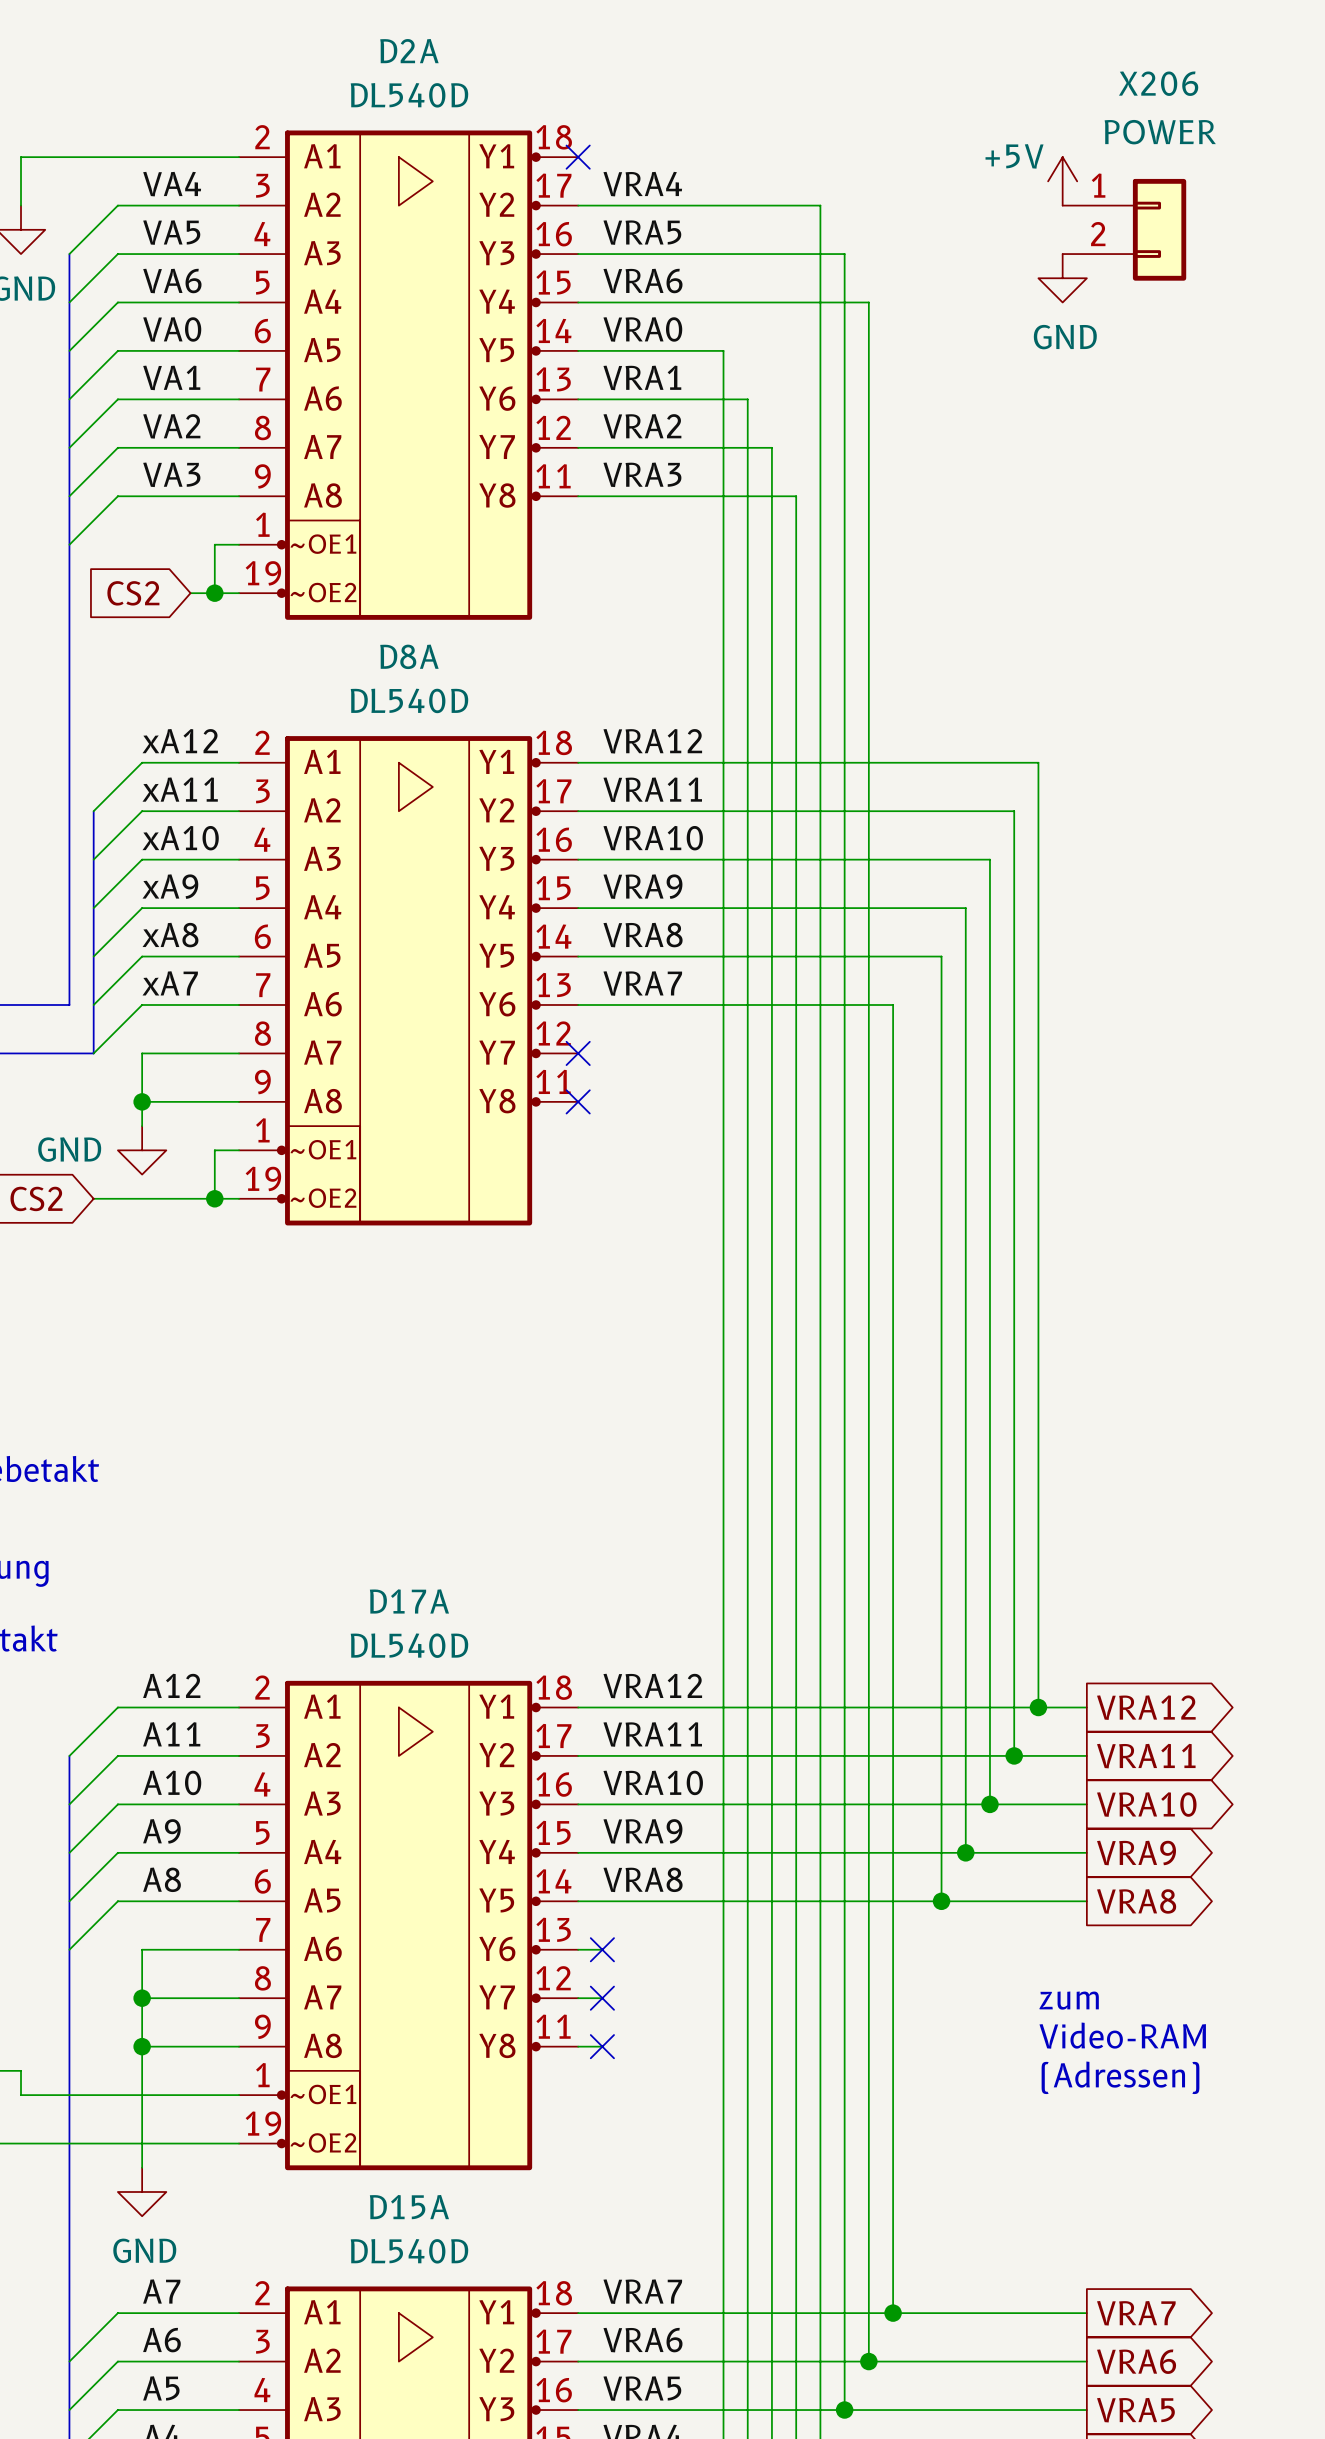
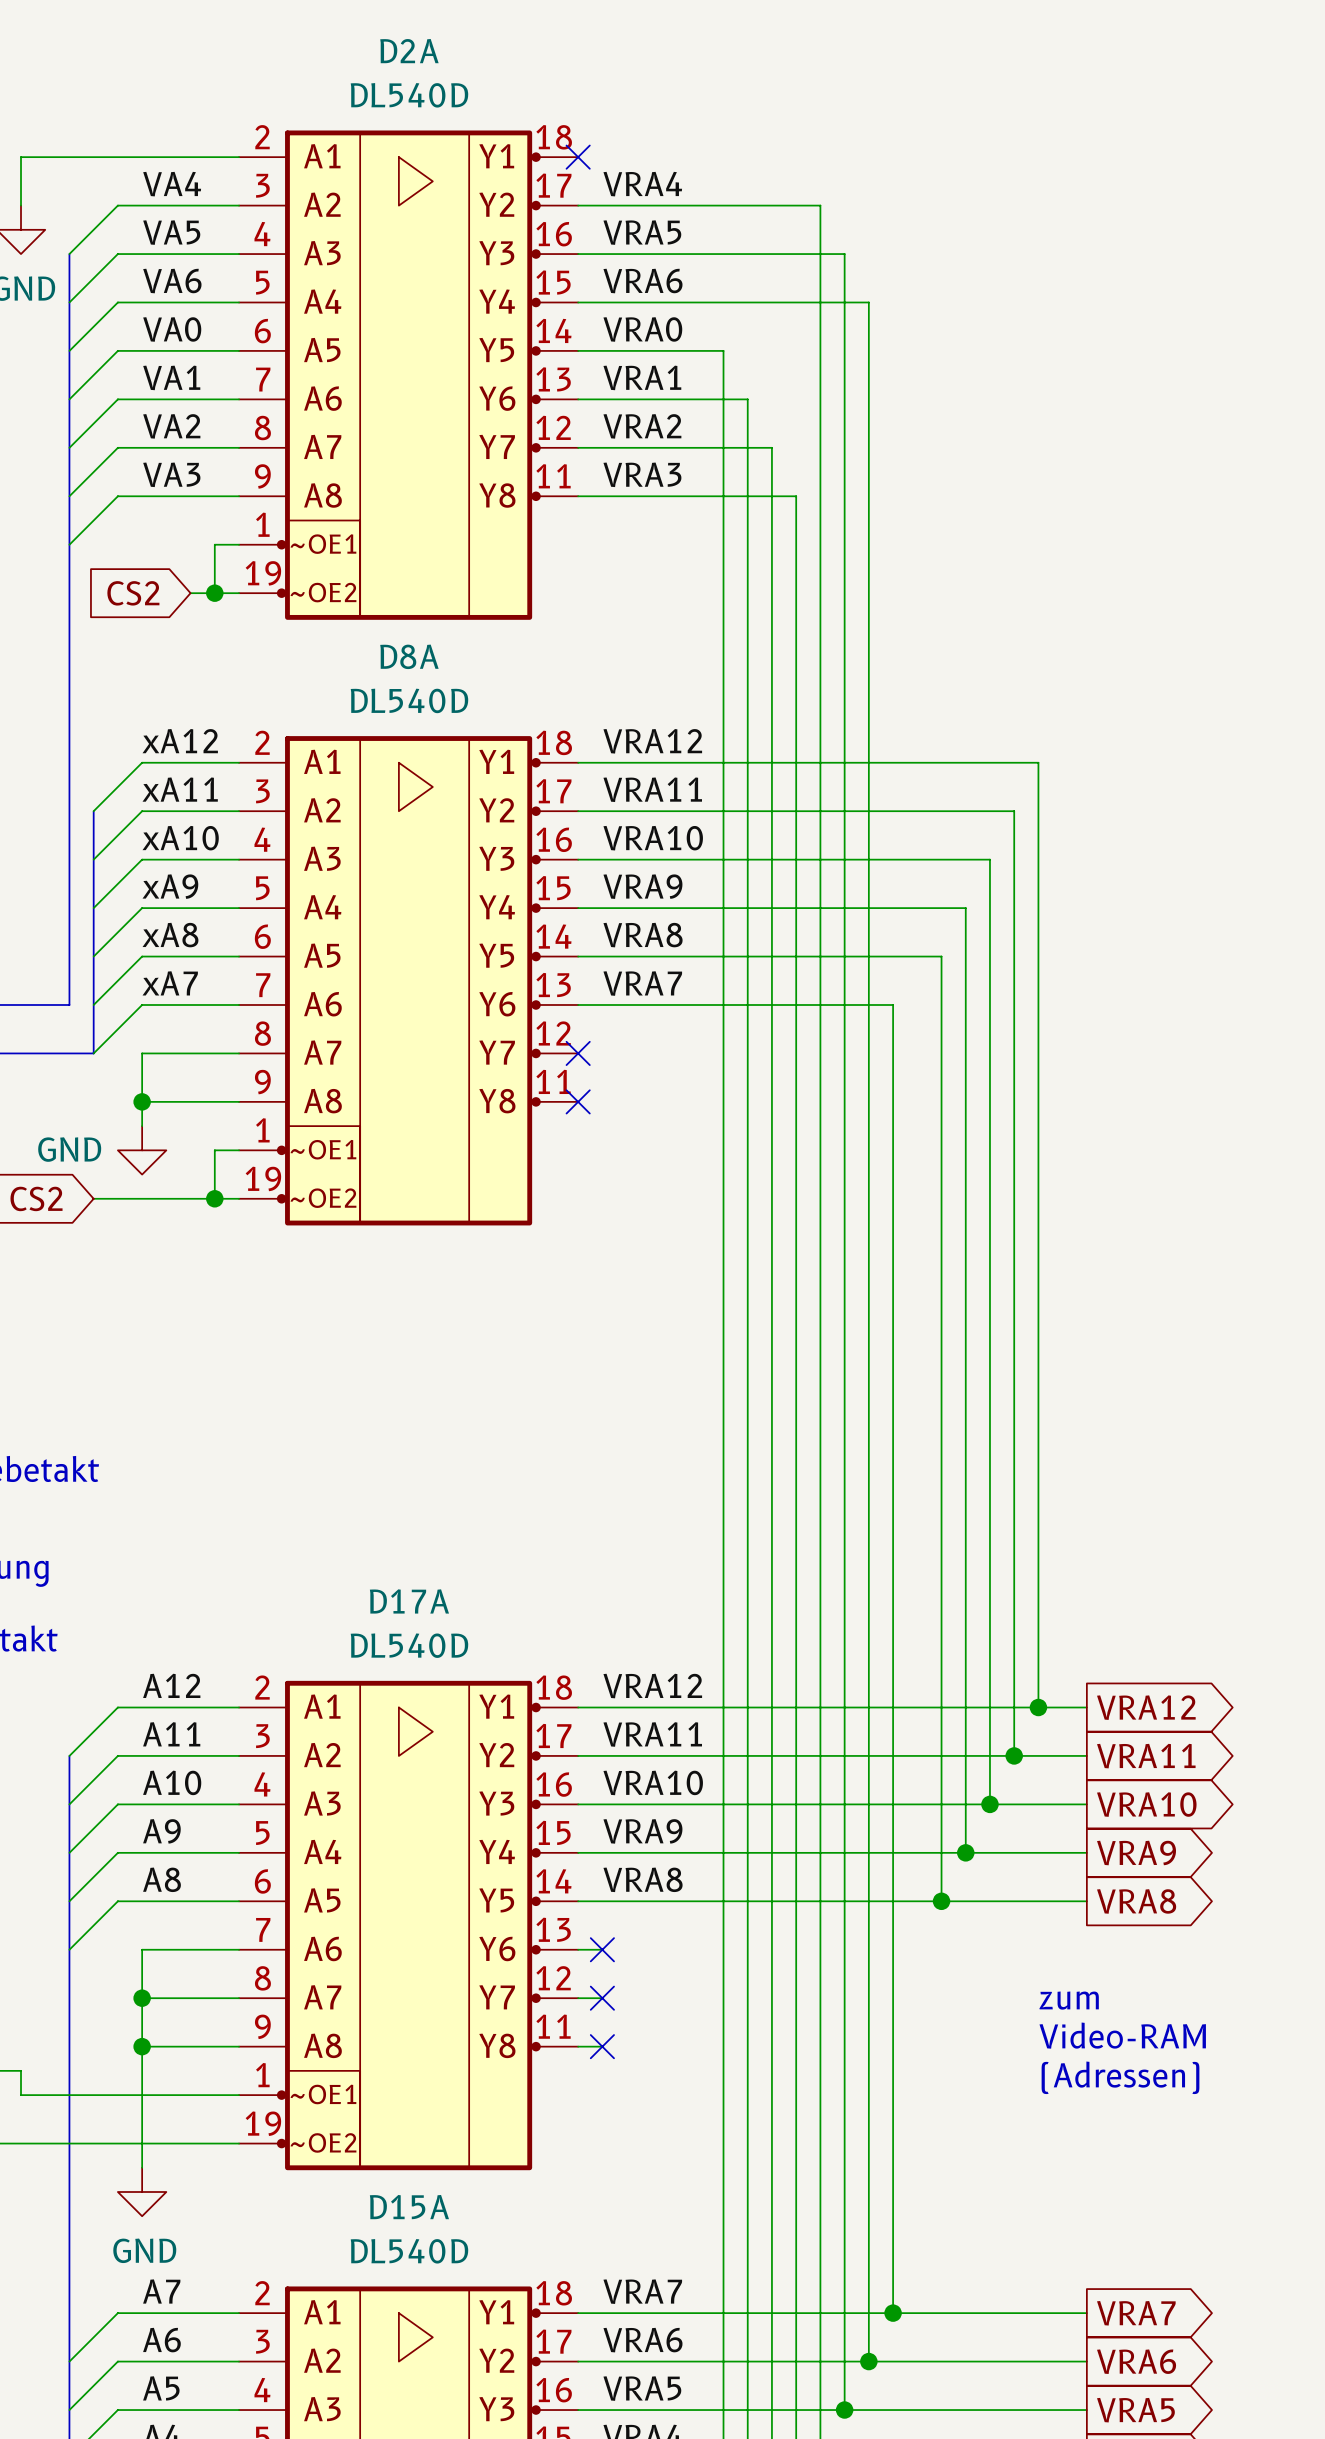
power symbol: +5V (1062, 181) -> none
X206: POWER (1124, 229) -> none
power symbol: GND (1062, 278) -> none

